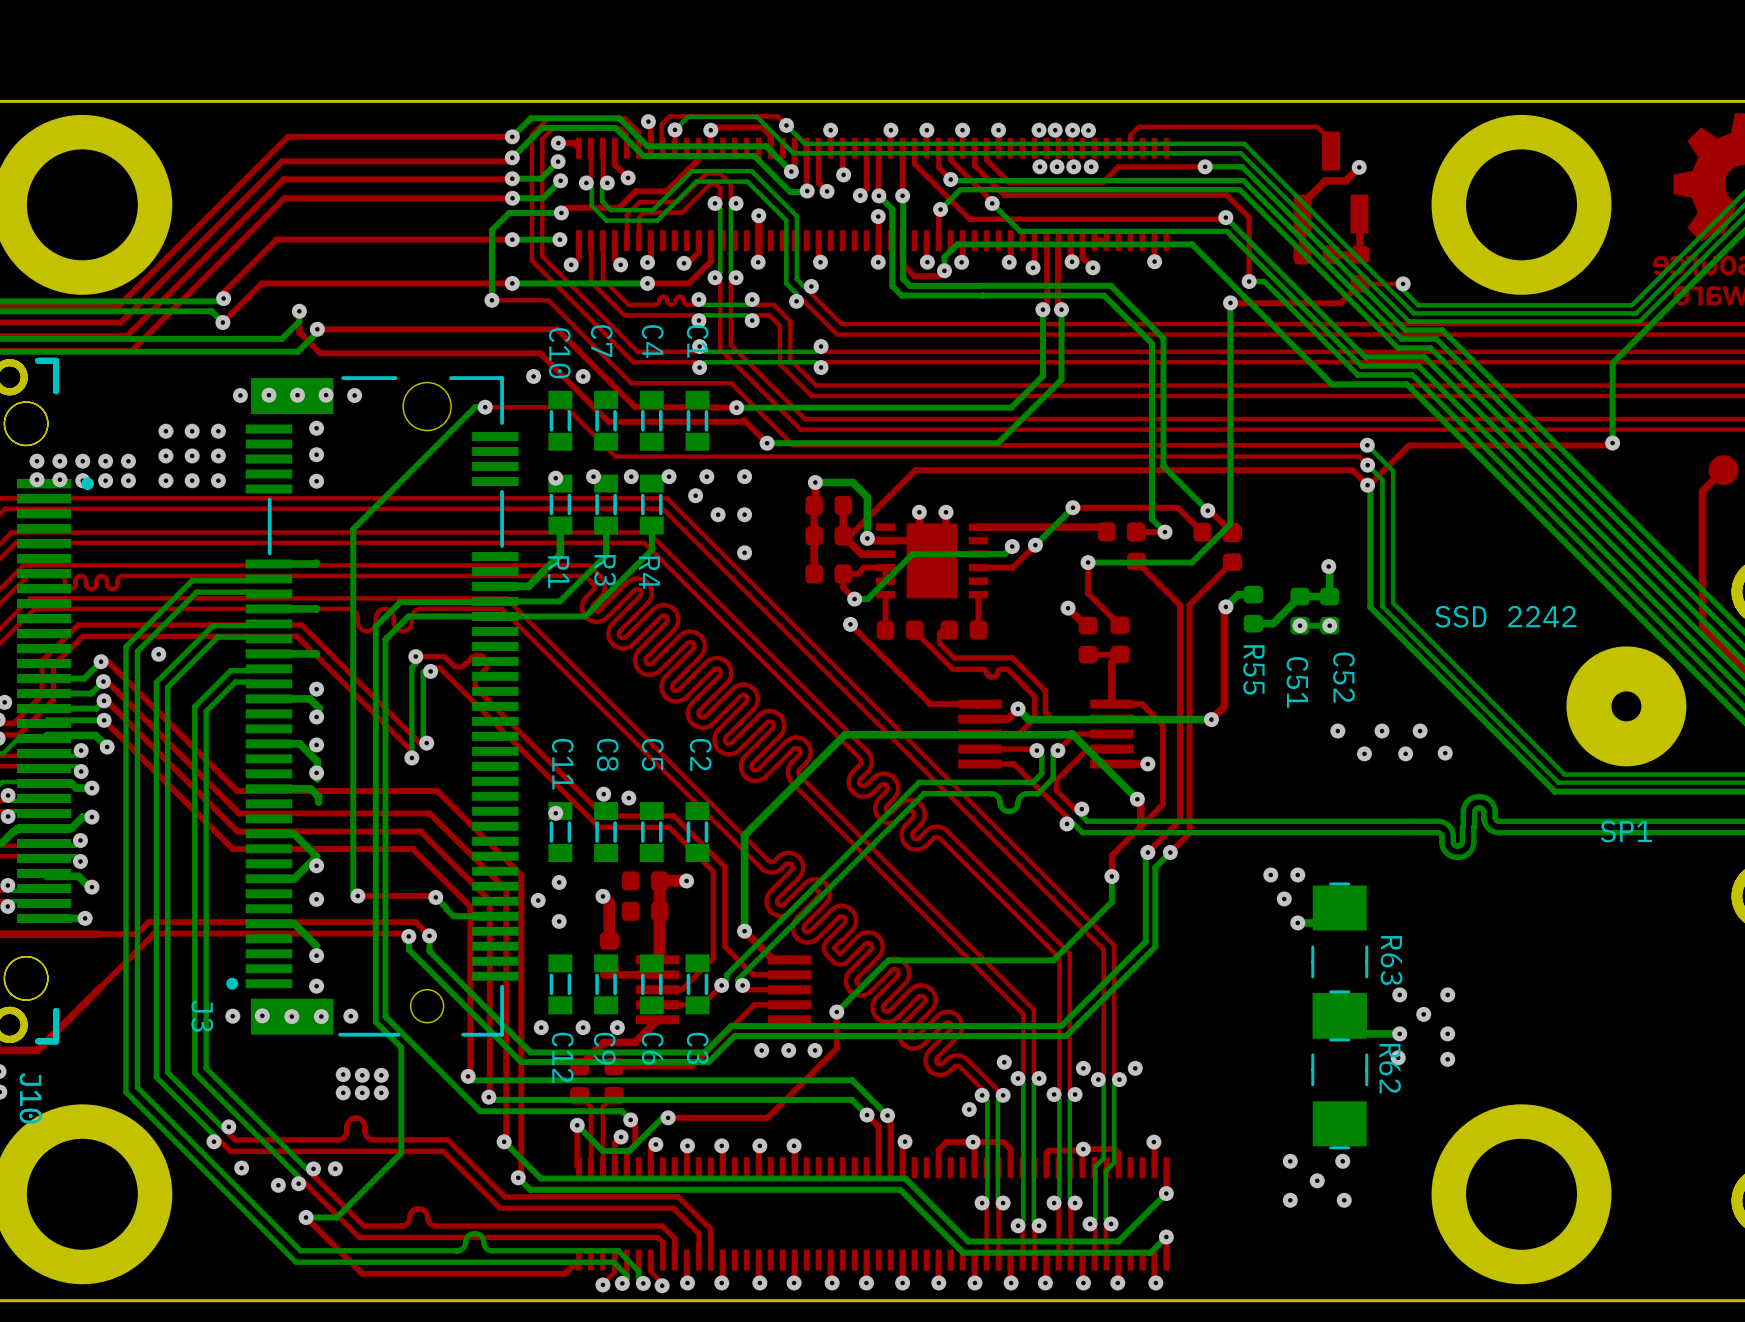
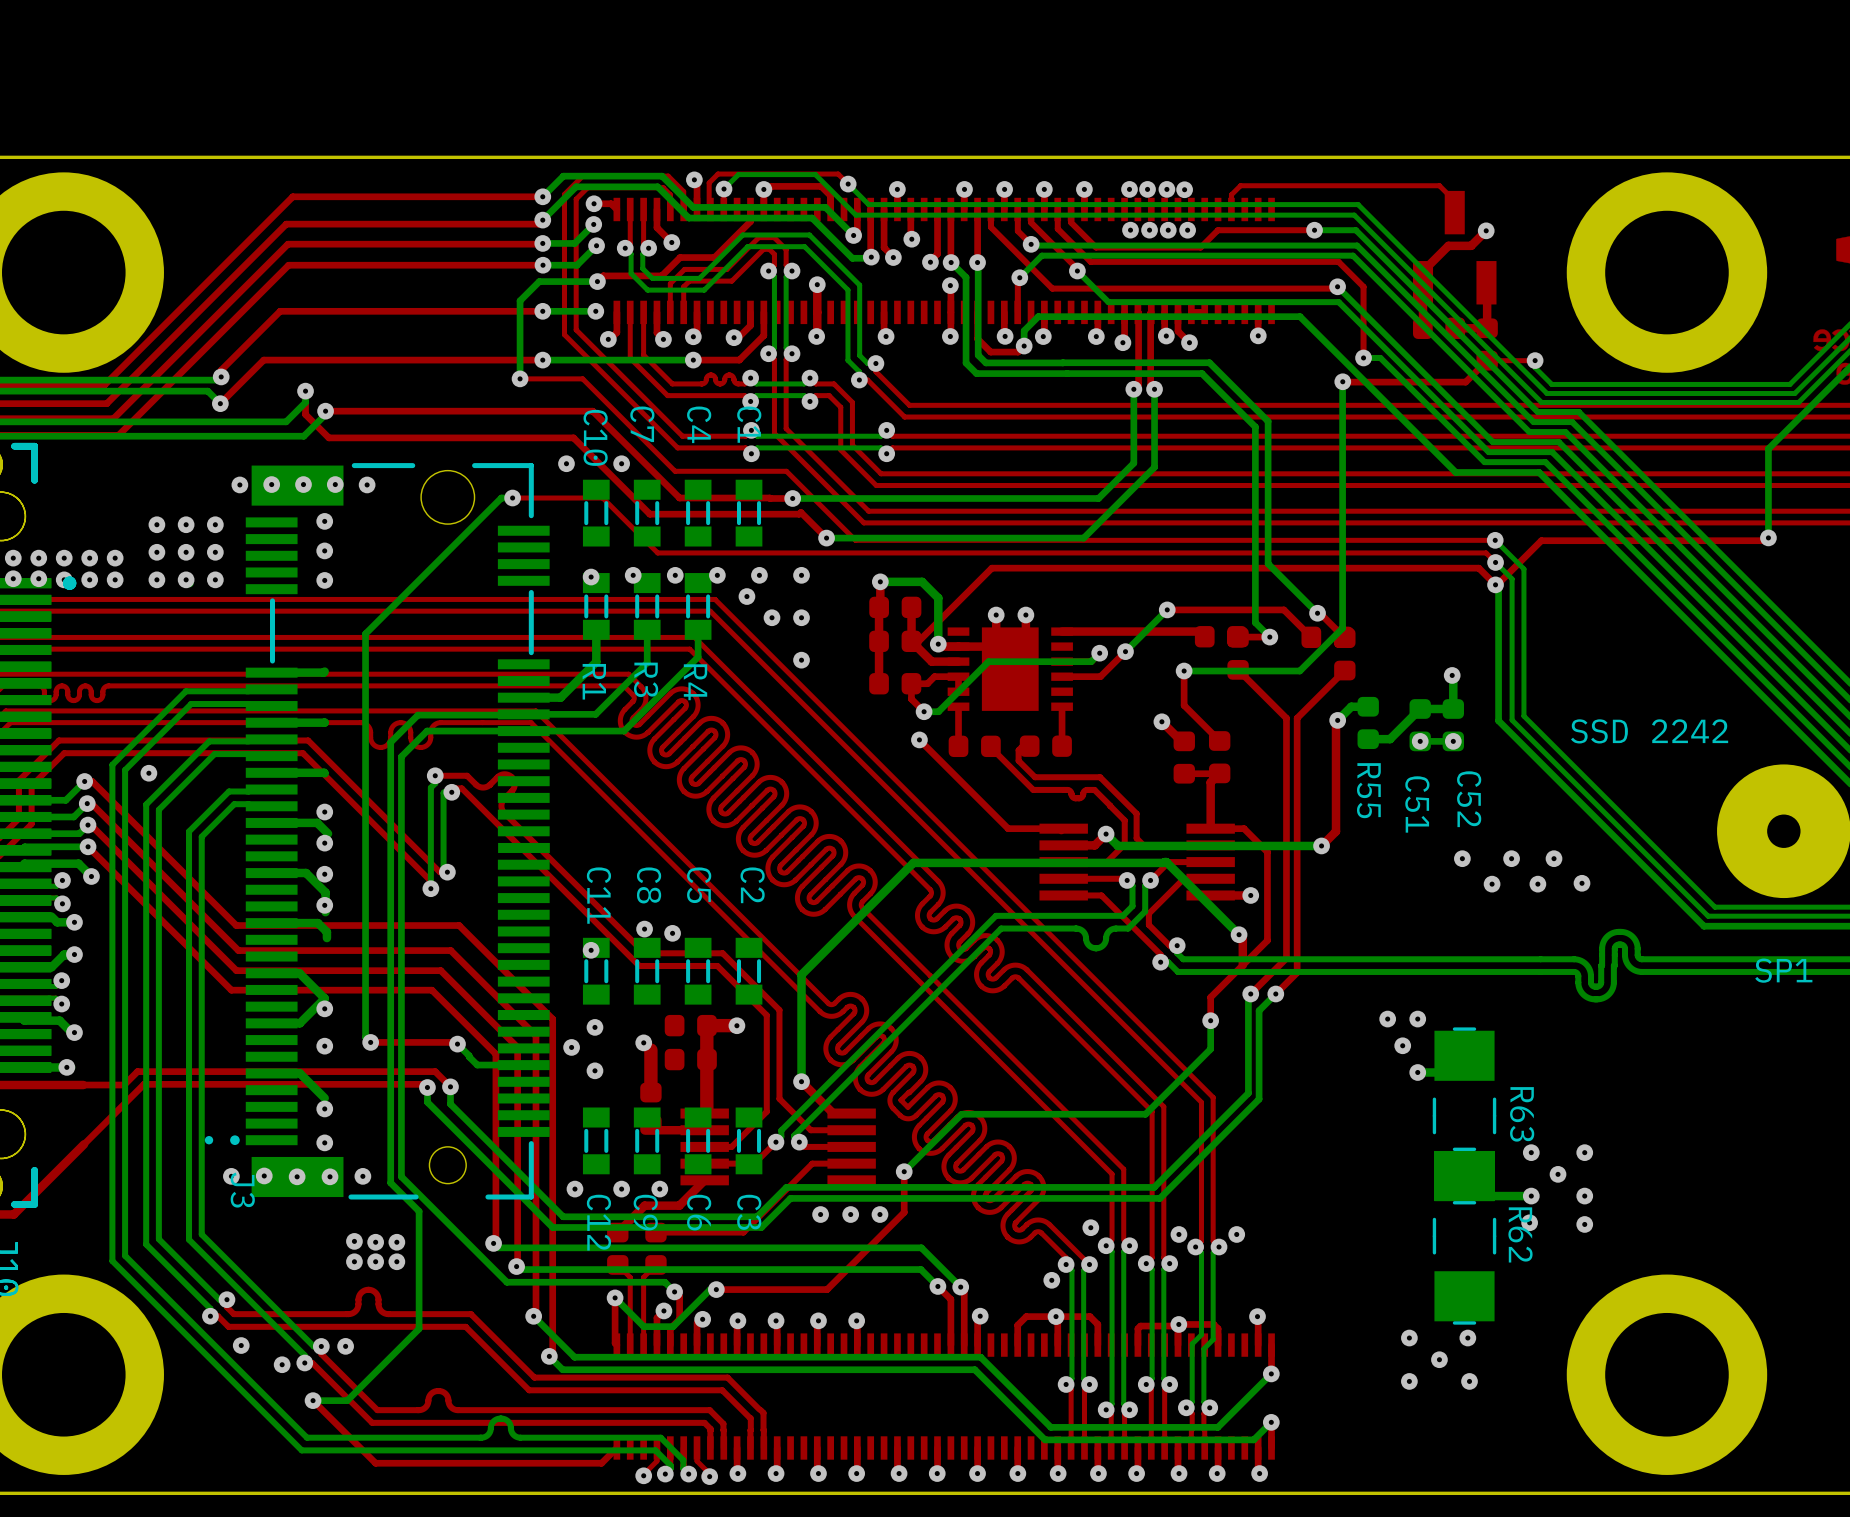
J3 footprint: [226, 376, 519, 1037] -> [204, 463, 550, 1200]
J3 name position: J3 (202, 1016) -> J3 (242, 1190)

